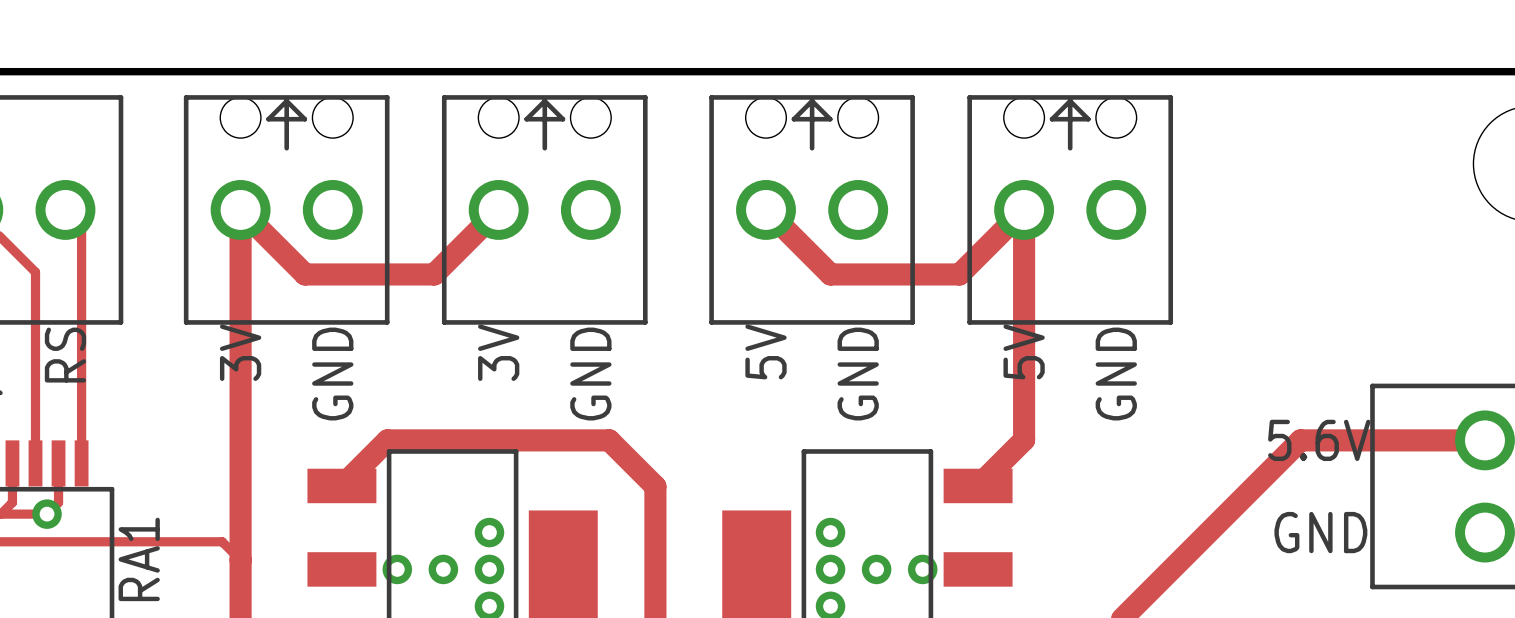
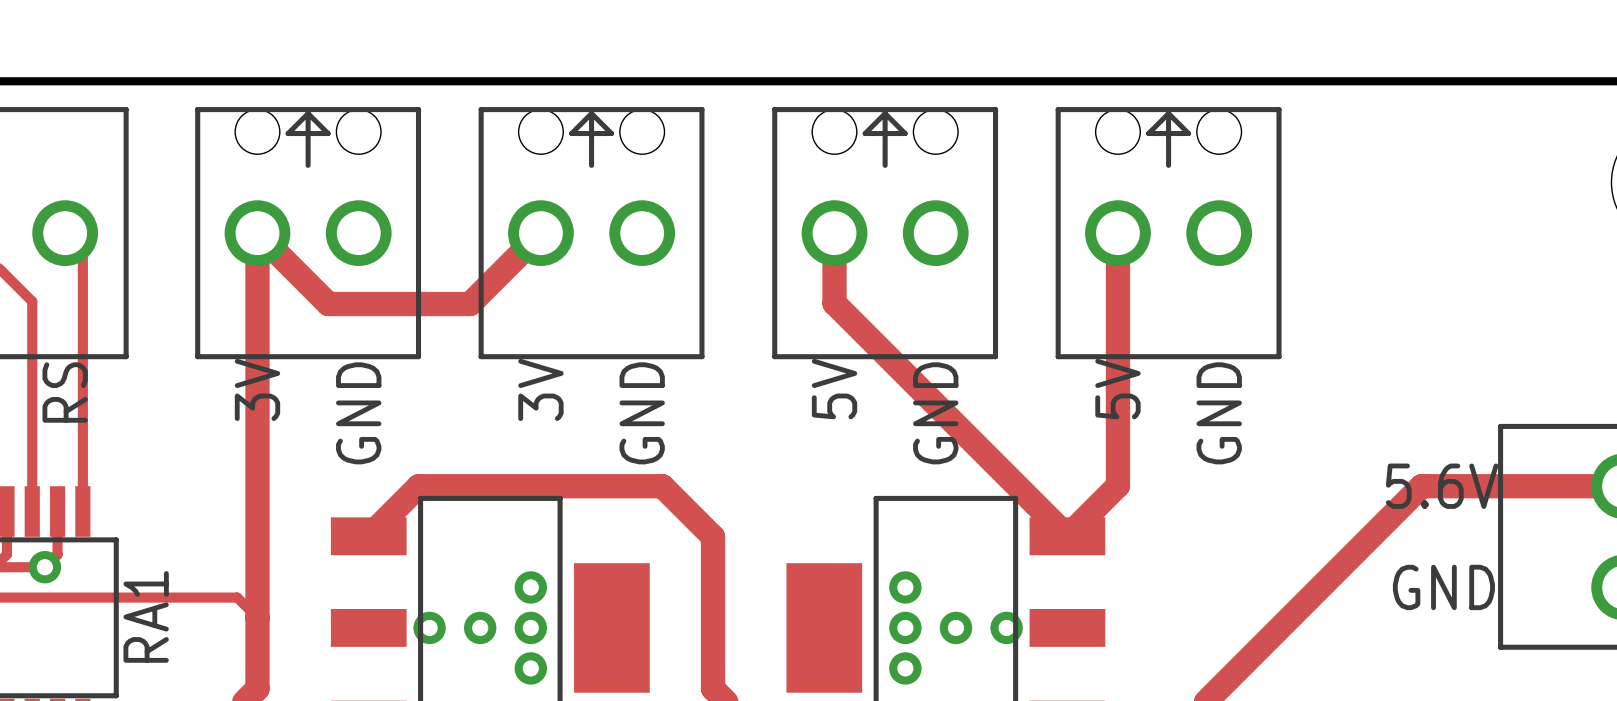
top track: (766, 209) (830, 274) (959, 274) (1024, 209) -> (834, 233) (834, 303) (1067, 536)

